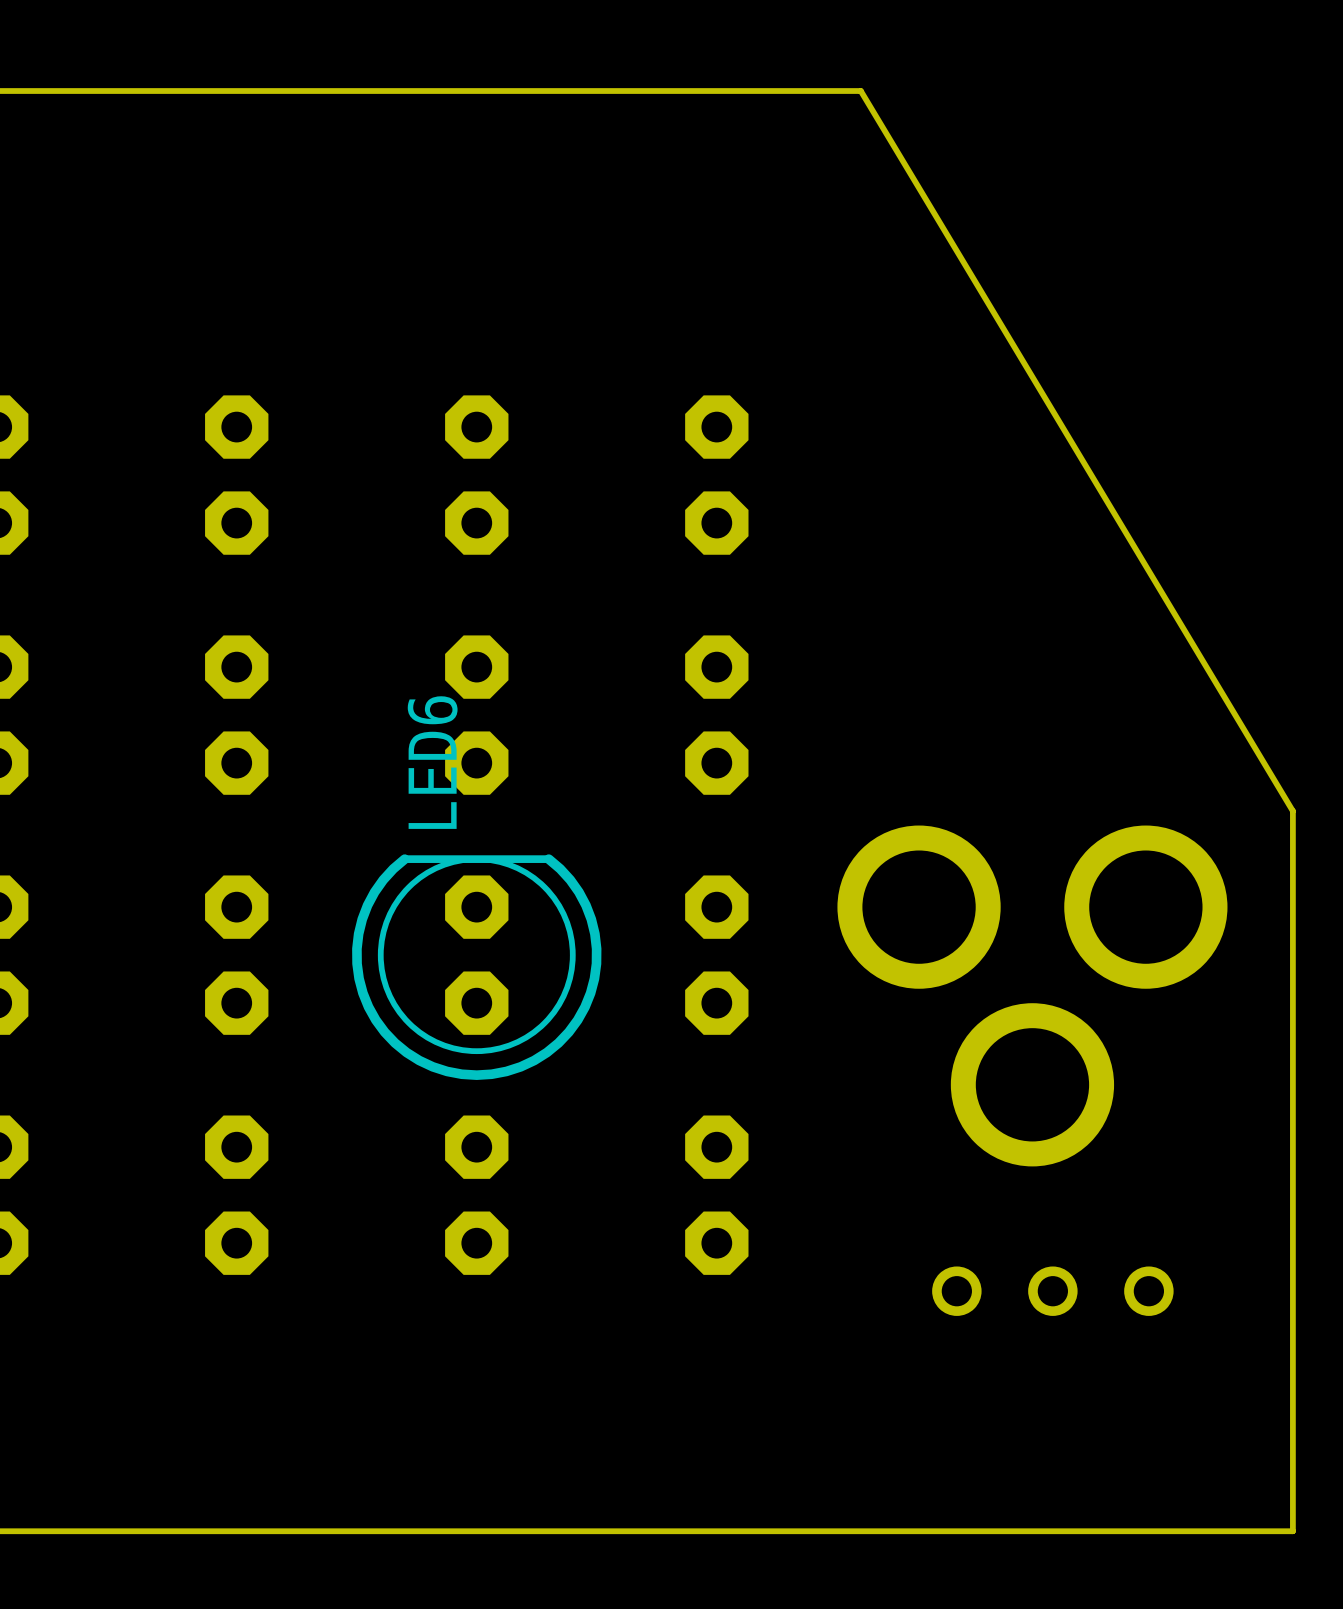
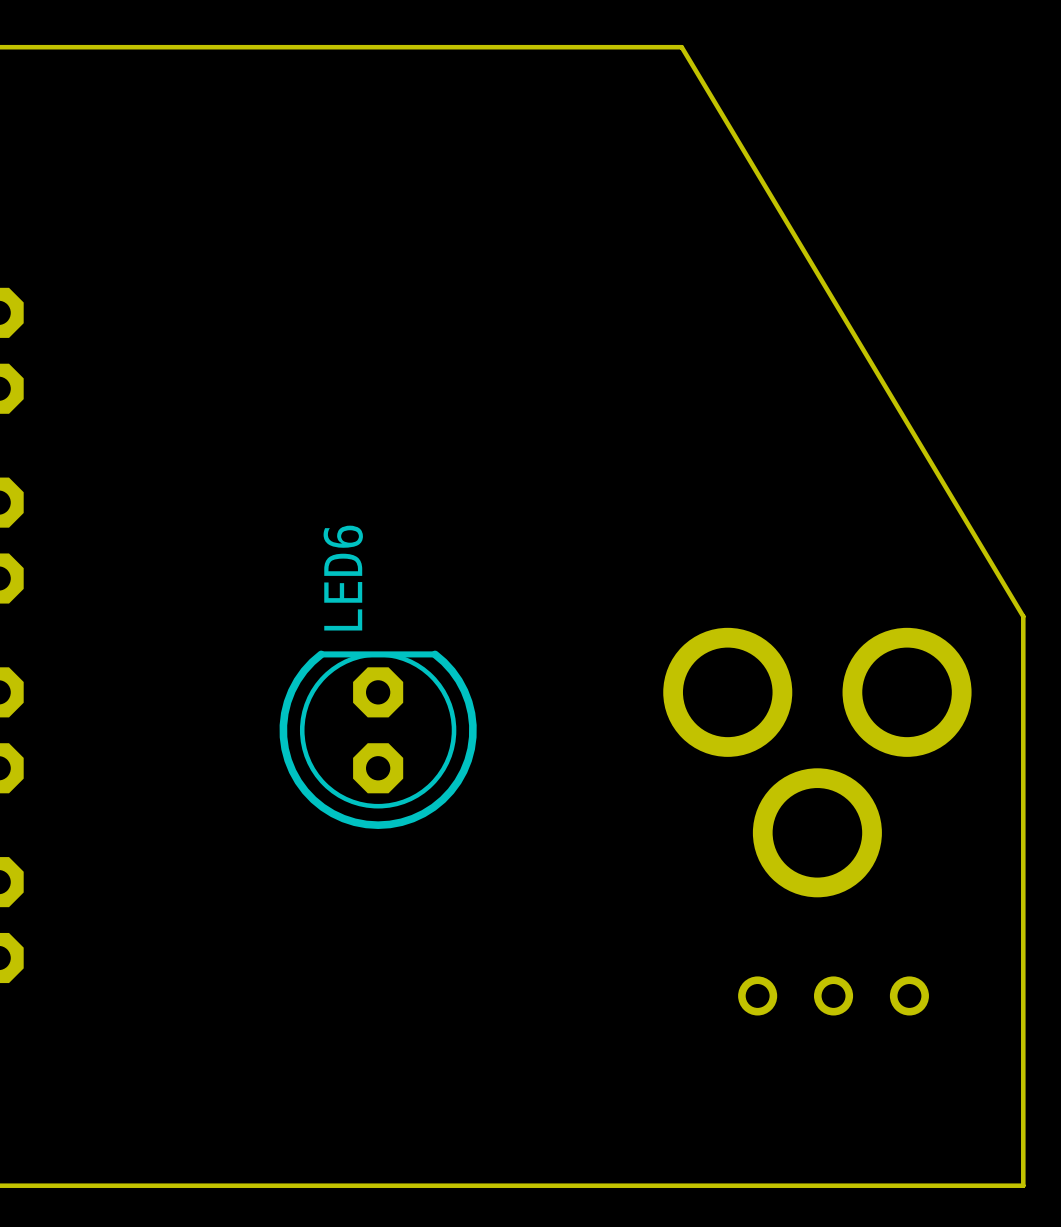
part: (236, 475) -> none
part: (476, 475) -> none
part: (716, 475) -> none
part: (236, 715) -> none
part: (476, 715) -> none
part: (716, 715) -> none
part: (236, 955) -> none
part: (716, 955) -> none
part: (236, 1195) -> none
part: (476, 1195) -> none
part: (716, 1195) -> none

